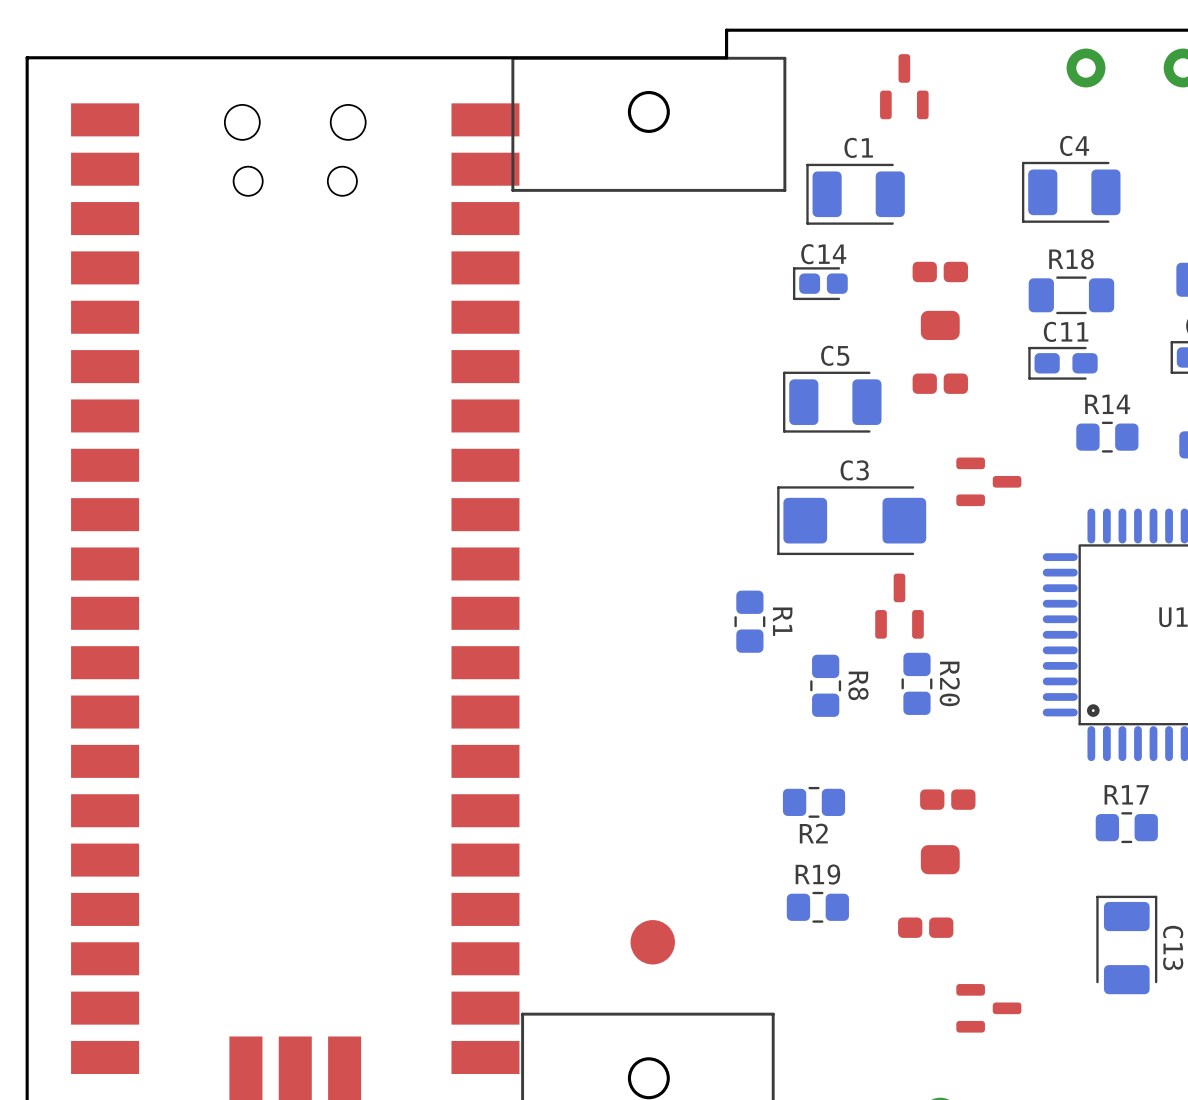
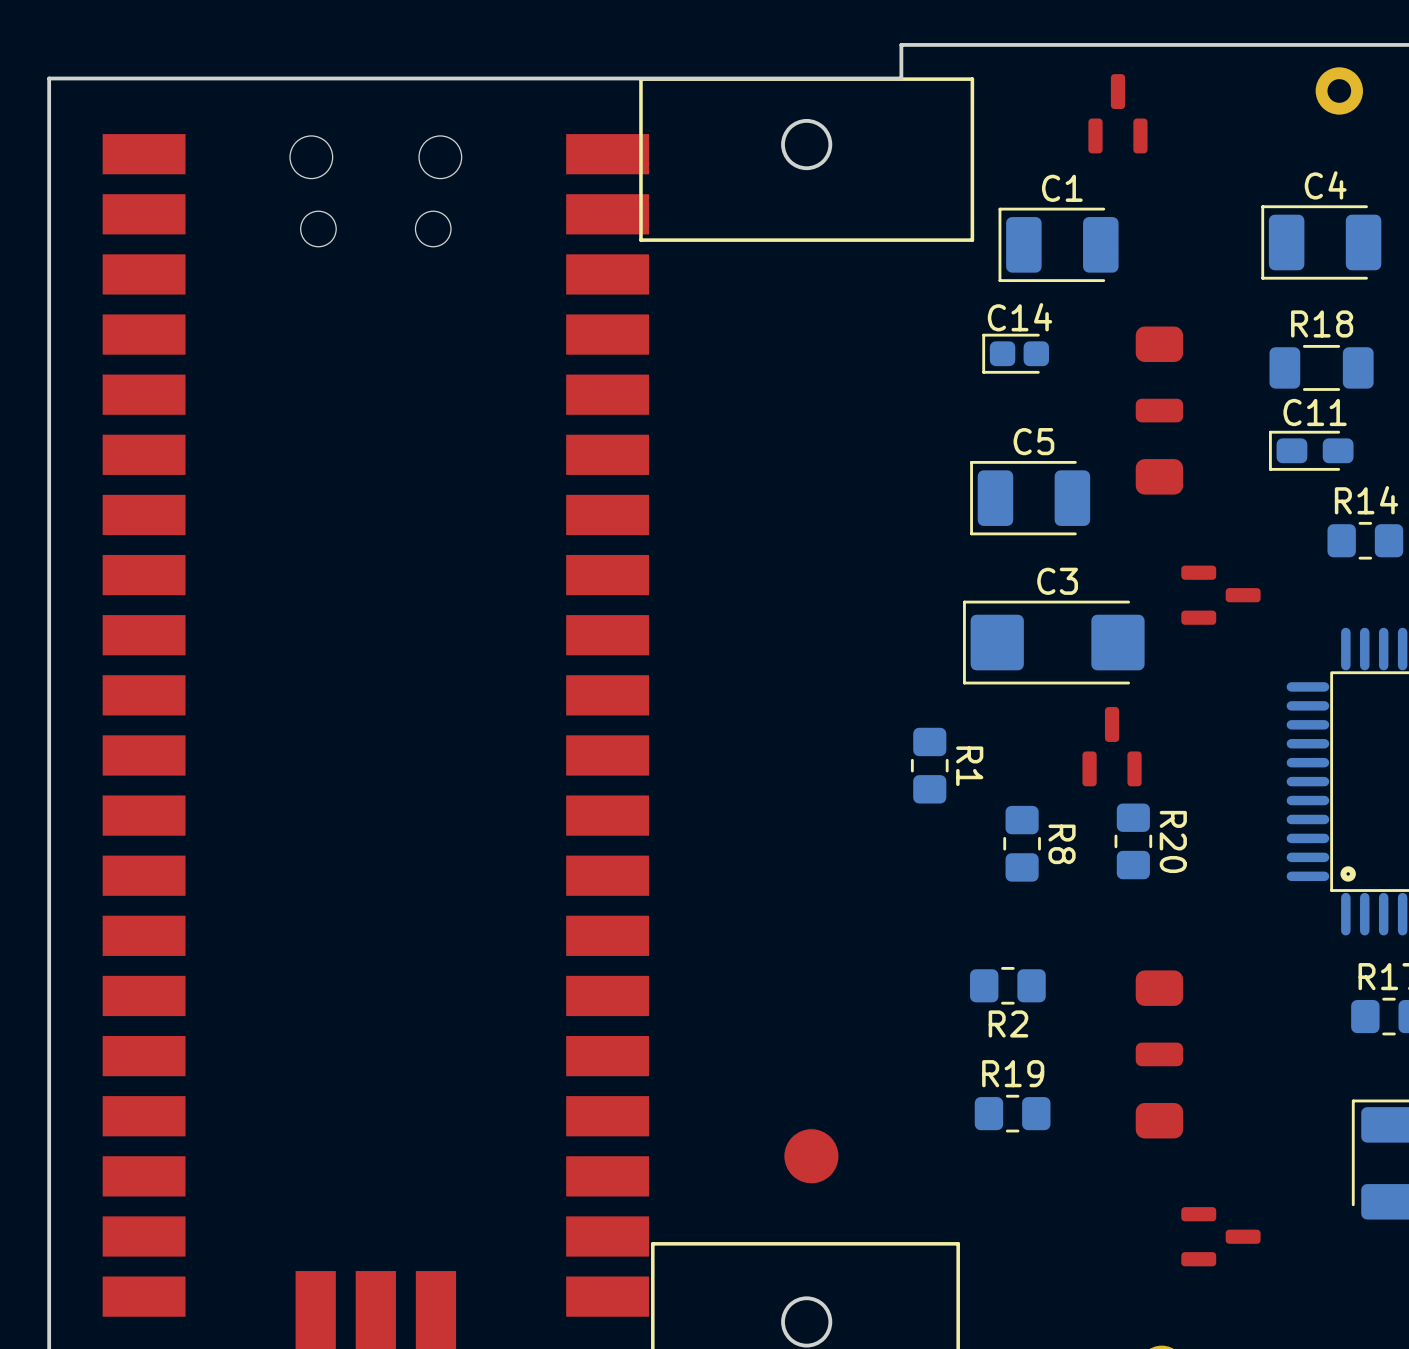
part: (940, 271) -> none
part footprint: [920, 310, 960, 340] -> [1135, 326, 1184, 495]
part: (940, 383) -> none
part: (947, 799) -> none
part footprint: [920, 845, 960, 875] -> [1135, 970, 1184, 1139]
part: (925, 927) -> none

